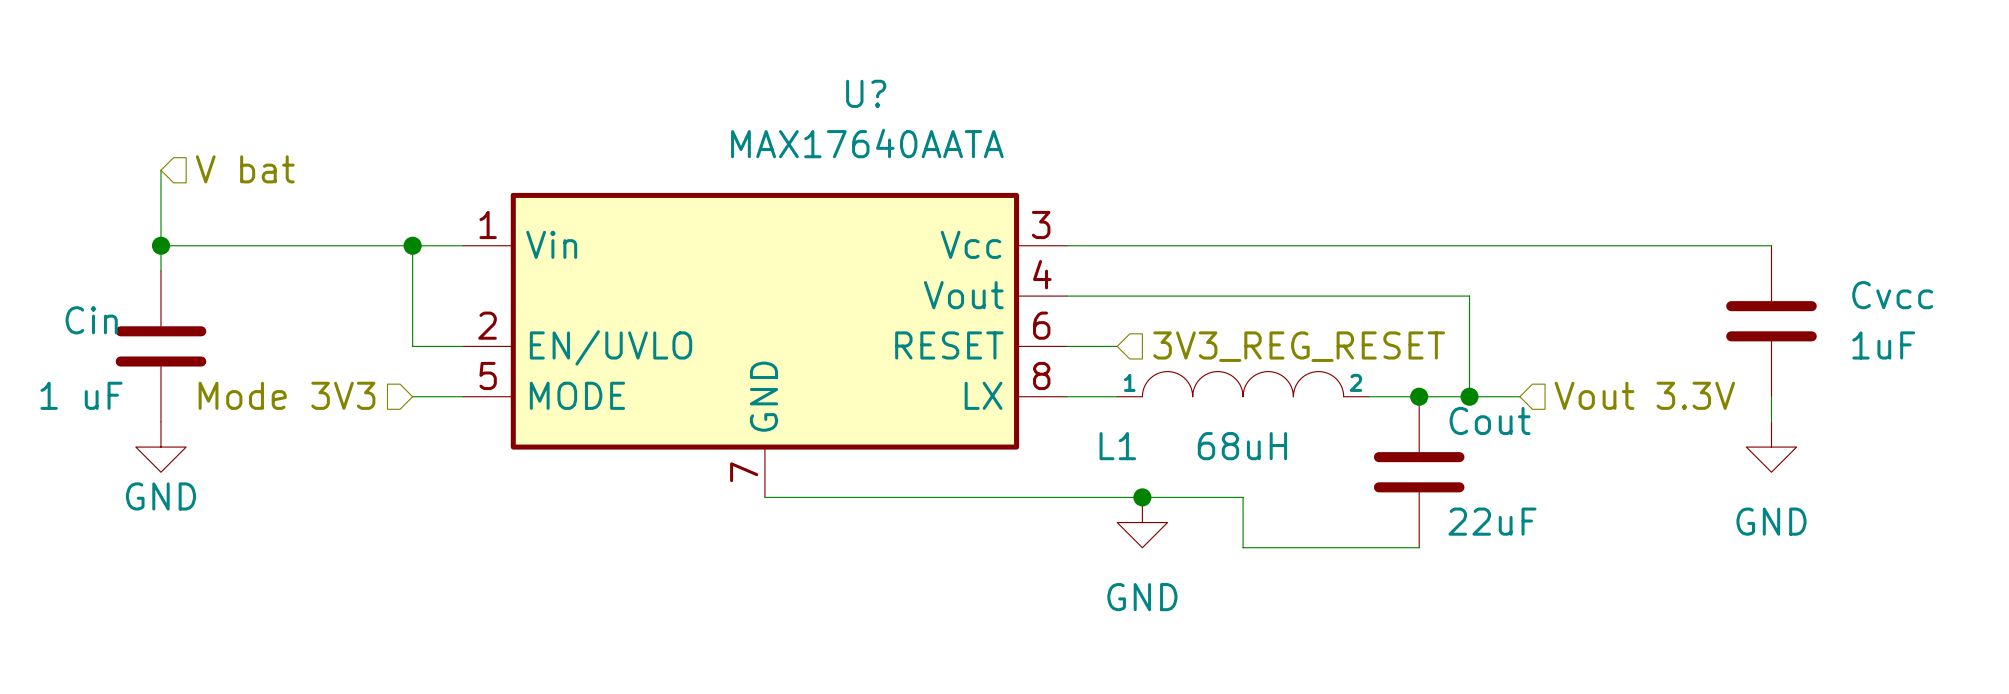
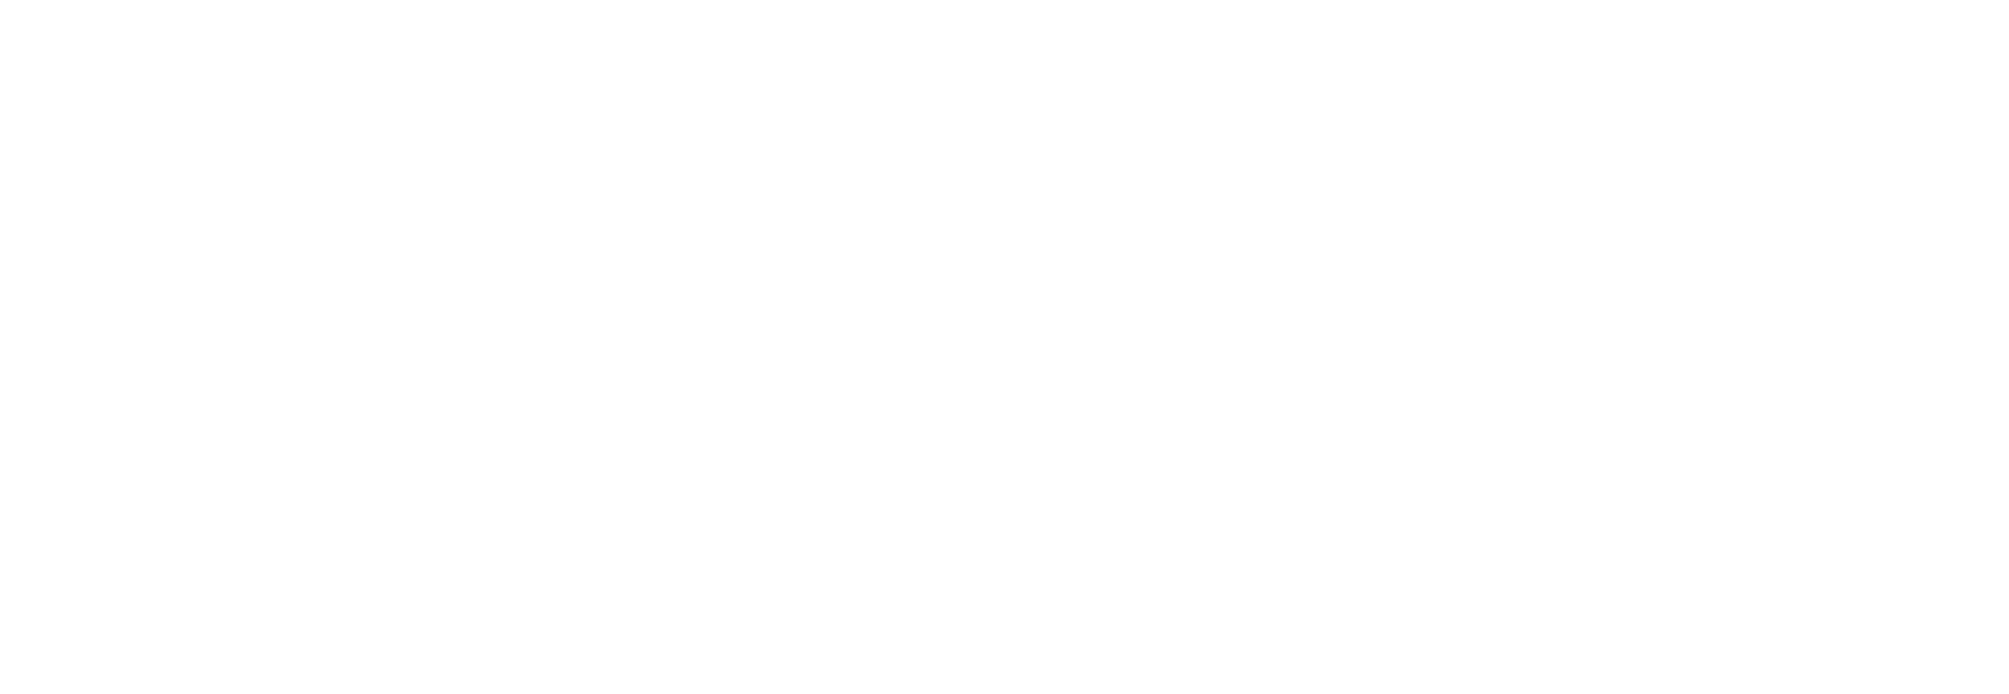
hierarchical label: V bat (245, 169) -> none
wire: (160, 170) (160, 270) -> none
wire: (160, 245) (462, 245) -> none
junction: (160, 245) -> none
wire: (412, 245) (412, 346) (462, 346) -> none
junction: (412, 245) -> none
wire: (1066, 245) (1771, 245) -> none
wire: (1066, 296) (1469, 296) (1469, 396) -> none
Cvcc: 1uF (1771, 321) -> none
U?: MAX17640AATA (764, 345) -> none
Cin: 1 uF (160, 346) -> none
wire: (1066, 346) (1117, 346) -> none
hierarchical label: 3V3_REG_RESET (1299, 346) -> none
L1: 68uH (1243, 384) -> none
hierarchical label: Mode 3V3 (287, 395) -> none
hierarchical label: Vout 3.3V (1644, 395) -> none
wire: (412, 396) (462, 396) -> none
wire: (1066, 396) (1117, 396) -> none
wire: (1368, 396) (1519, 396) -> none
junction: (1419, 396) -> none
junction: (1469, 396) -> none
wire: (1771, 396) (1771, 421) -> none
power symbol: GND (160, 447) -> none
power symbol: GND (1771, 447) -> none
Cout: 22uF (1419, 472) -> none
wire: (764, 497) (1243, 497) (1243, 547) (1419, 547) -> none
junction: (1142, 497) -> none
power symbol: GND (1142, 522) -> none

